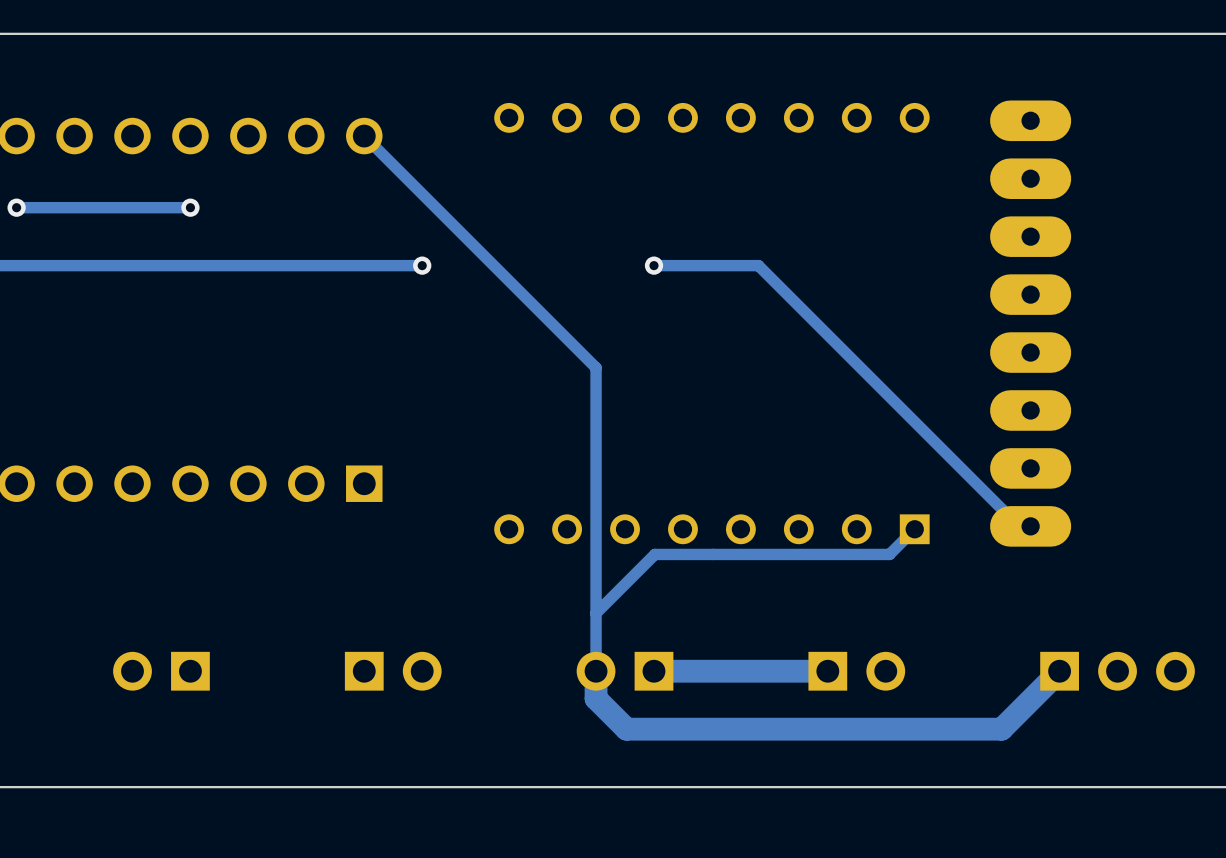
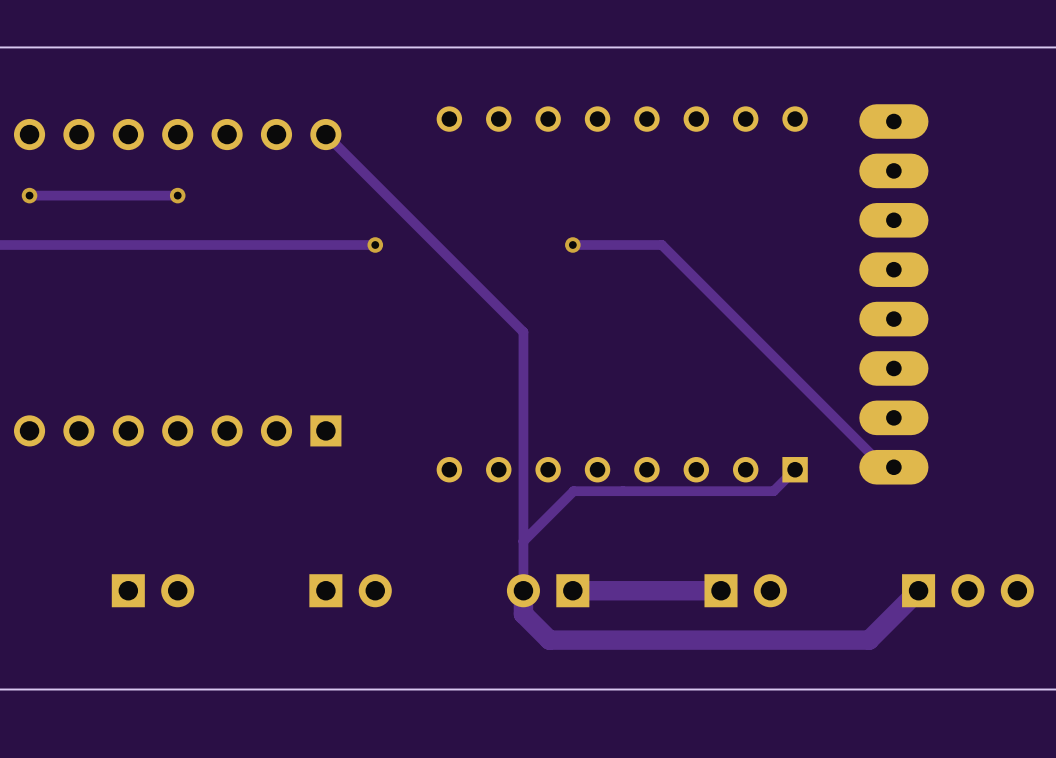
part rotation: 0° (161, 671) -> 180° (153, 590)

